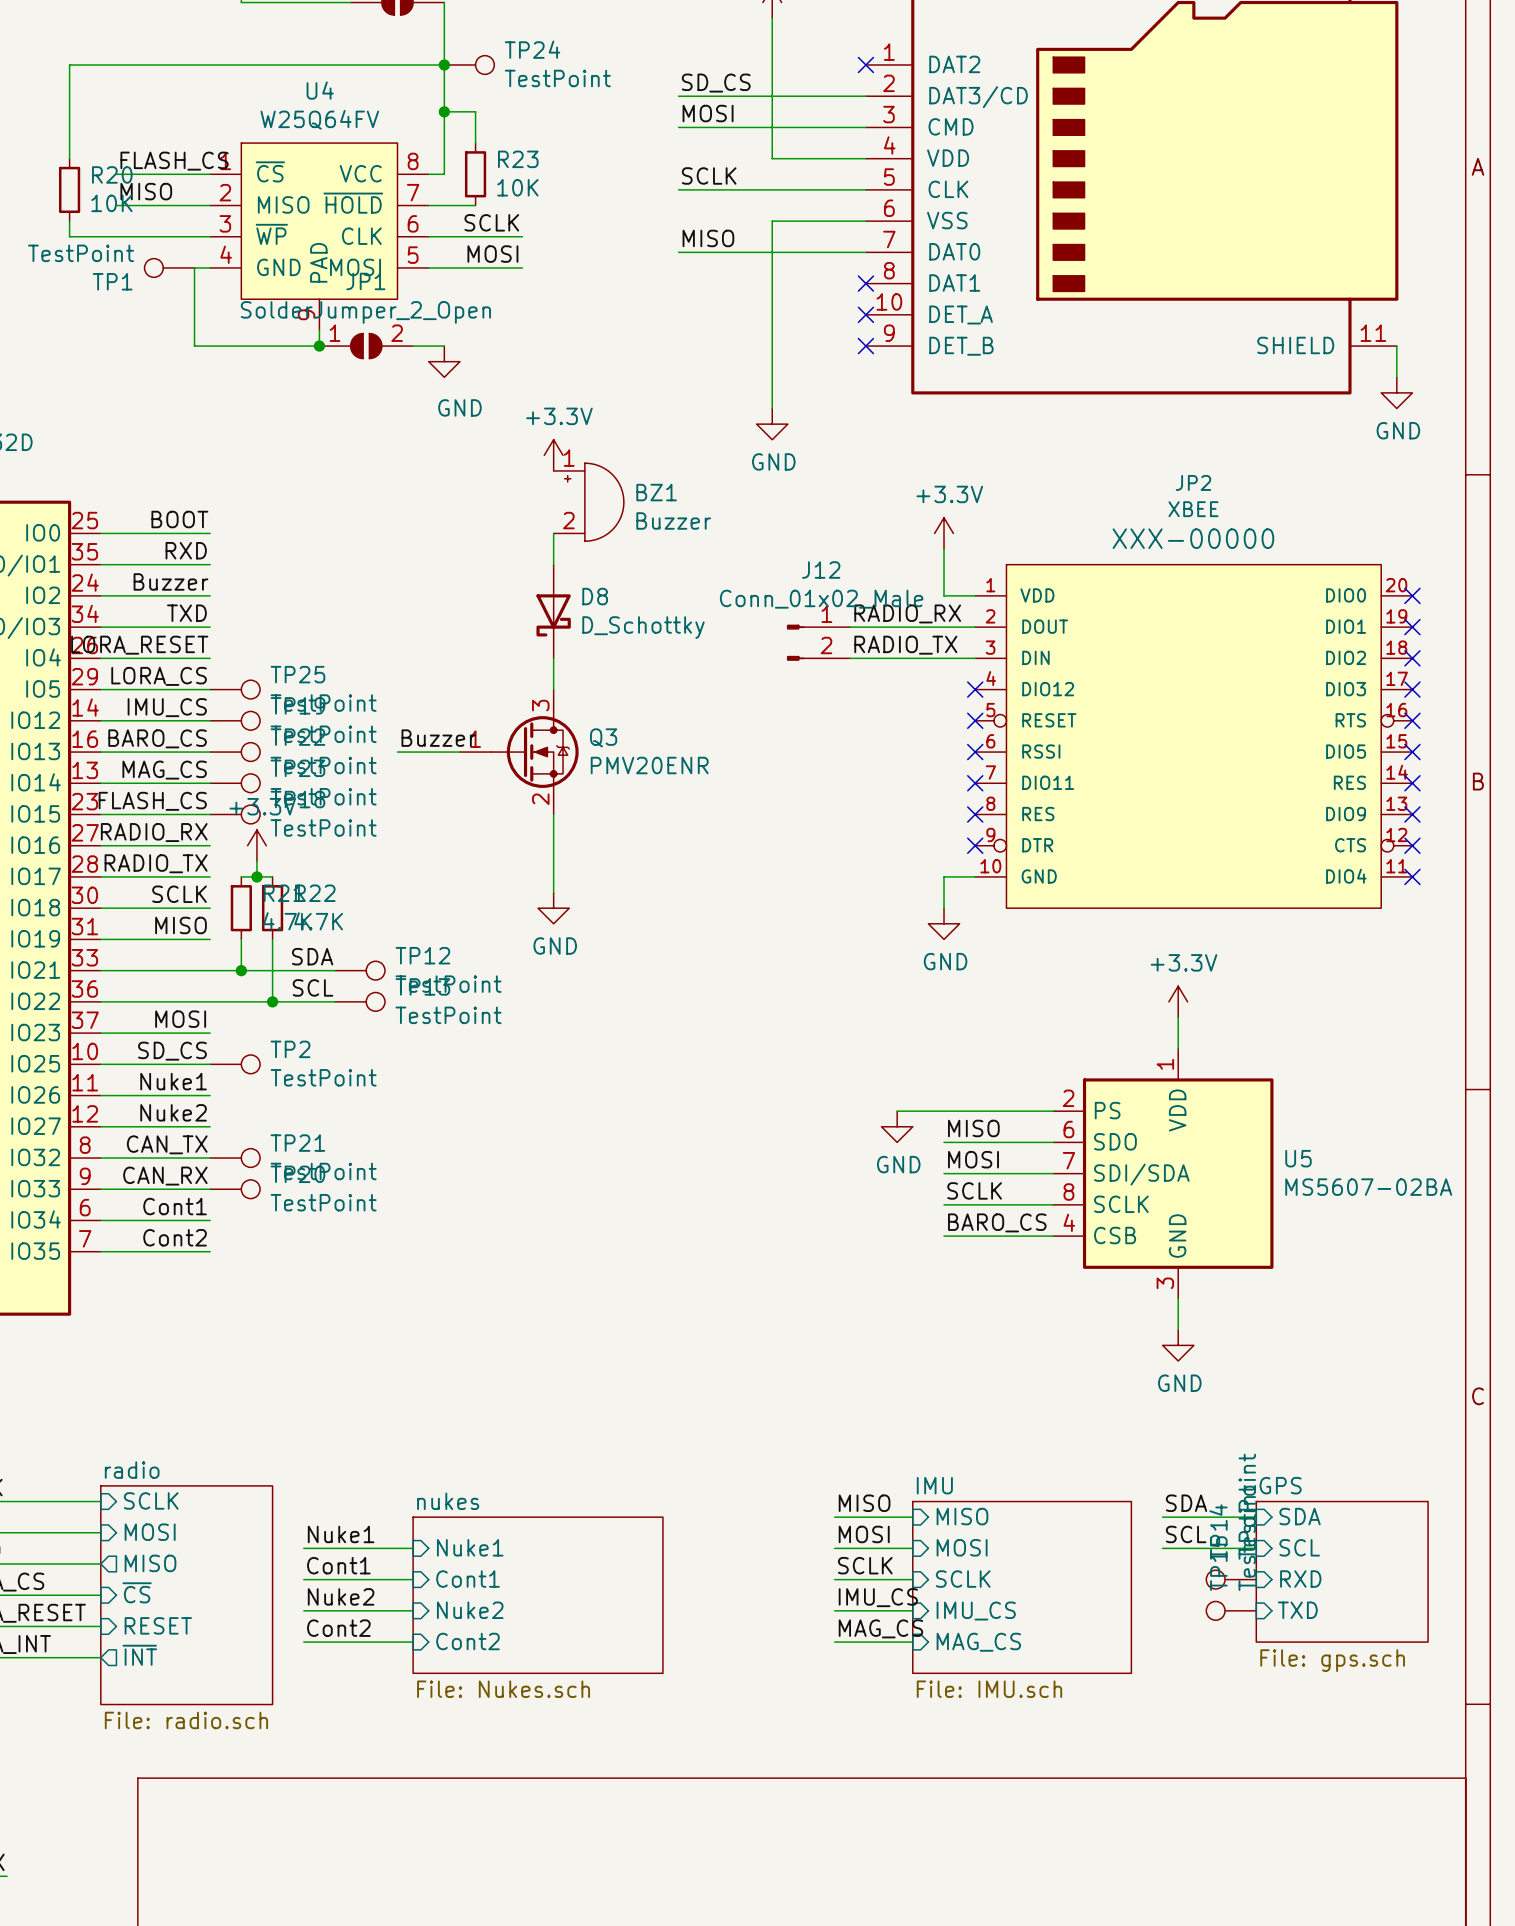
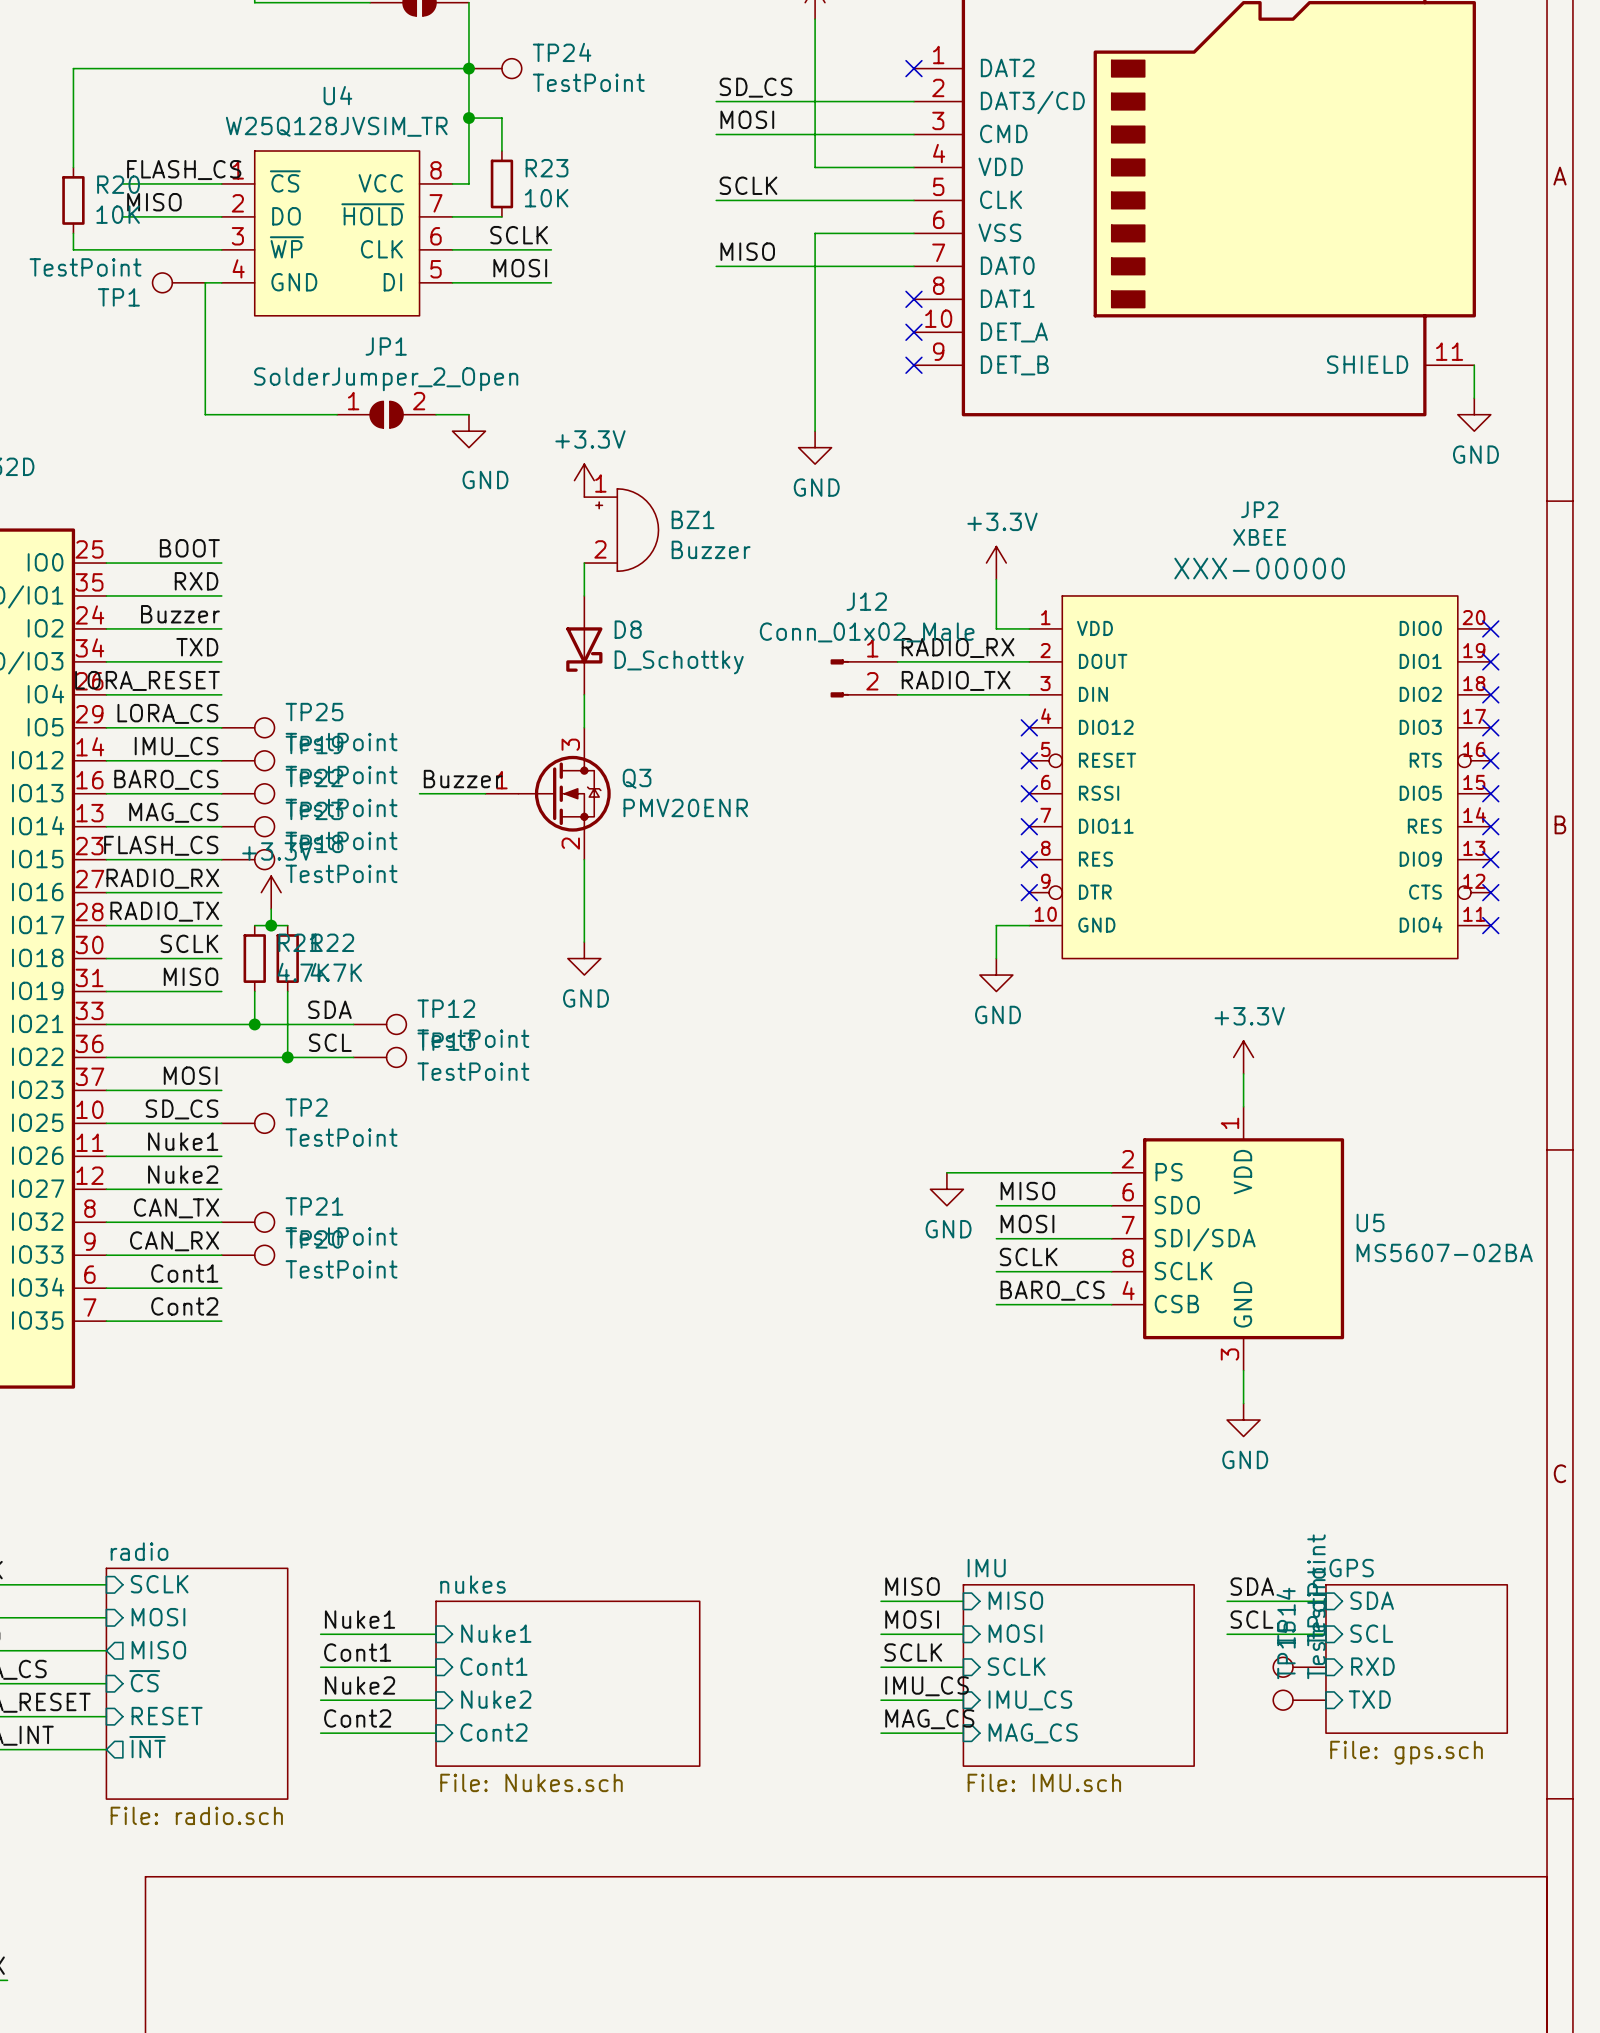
U4 value: W25Q64FV (319, 119) -> W25Q128JVSIM_TR (336, 126)
U4 symbol: [210, 143, 429, 331] -> [221, 151, 453, 316]
wire: (319, 330) (319, 346) (194, 346) -> (337, 414) (205, 414) (205, 365)
junction: (319, 346) -> none
JP1 position: (366, 346) -> (386, 414)
wire: (413, 346) (444, 346) -> (436, 414) (468, 414)
power symbol position: GND (444, 361) -> GND (468, 431)

